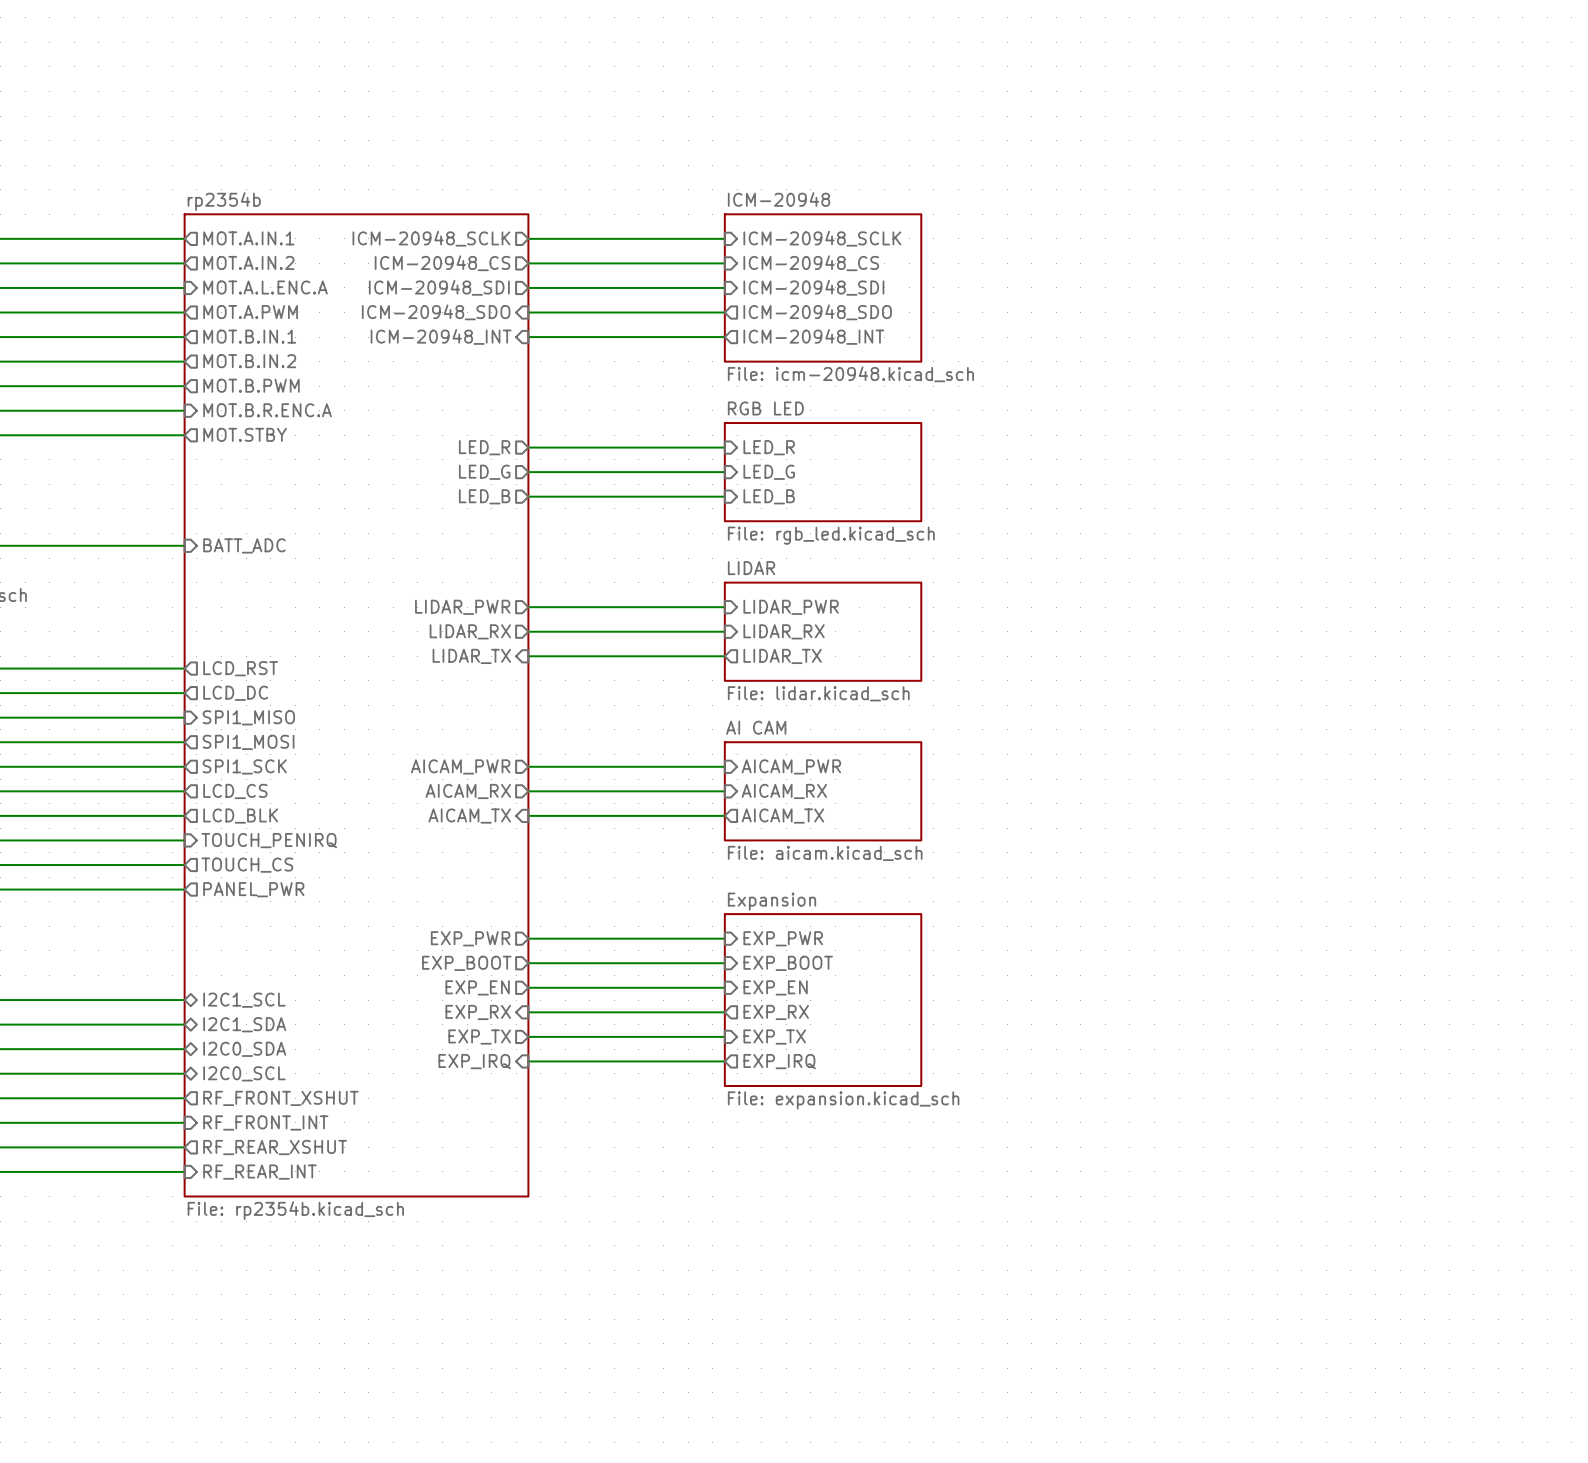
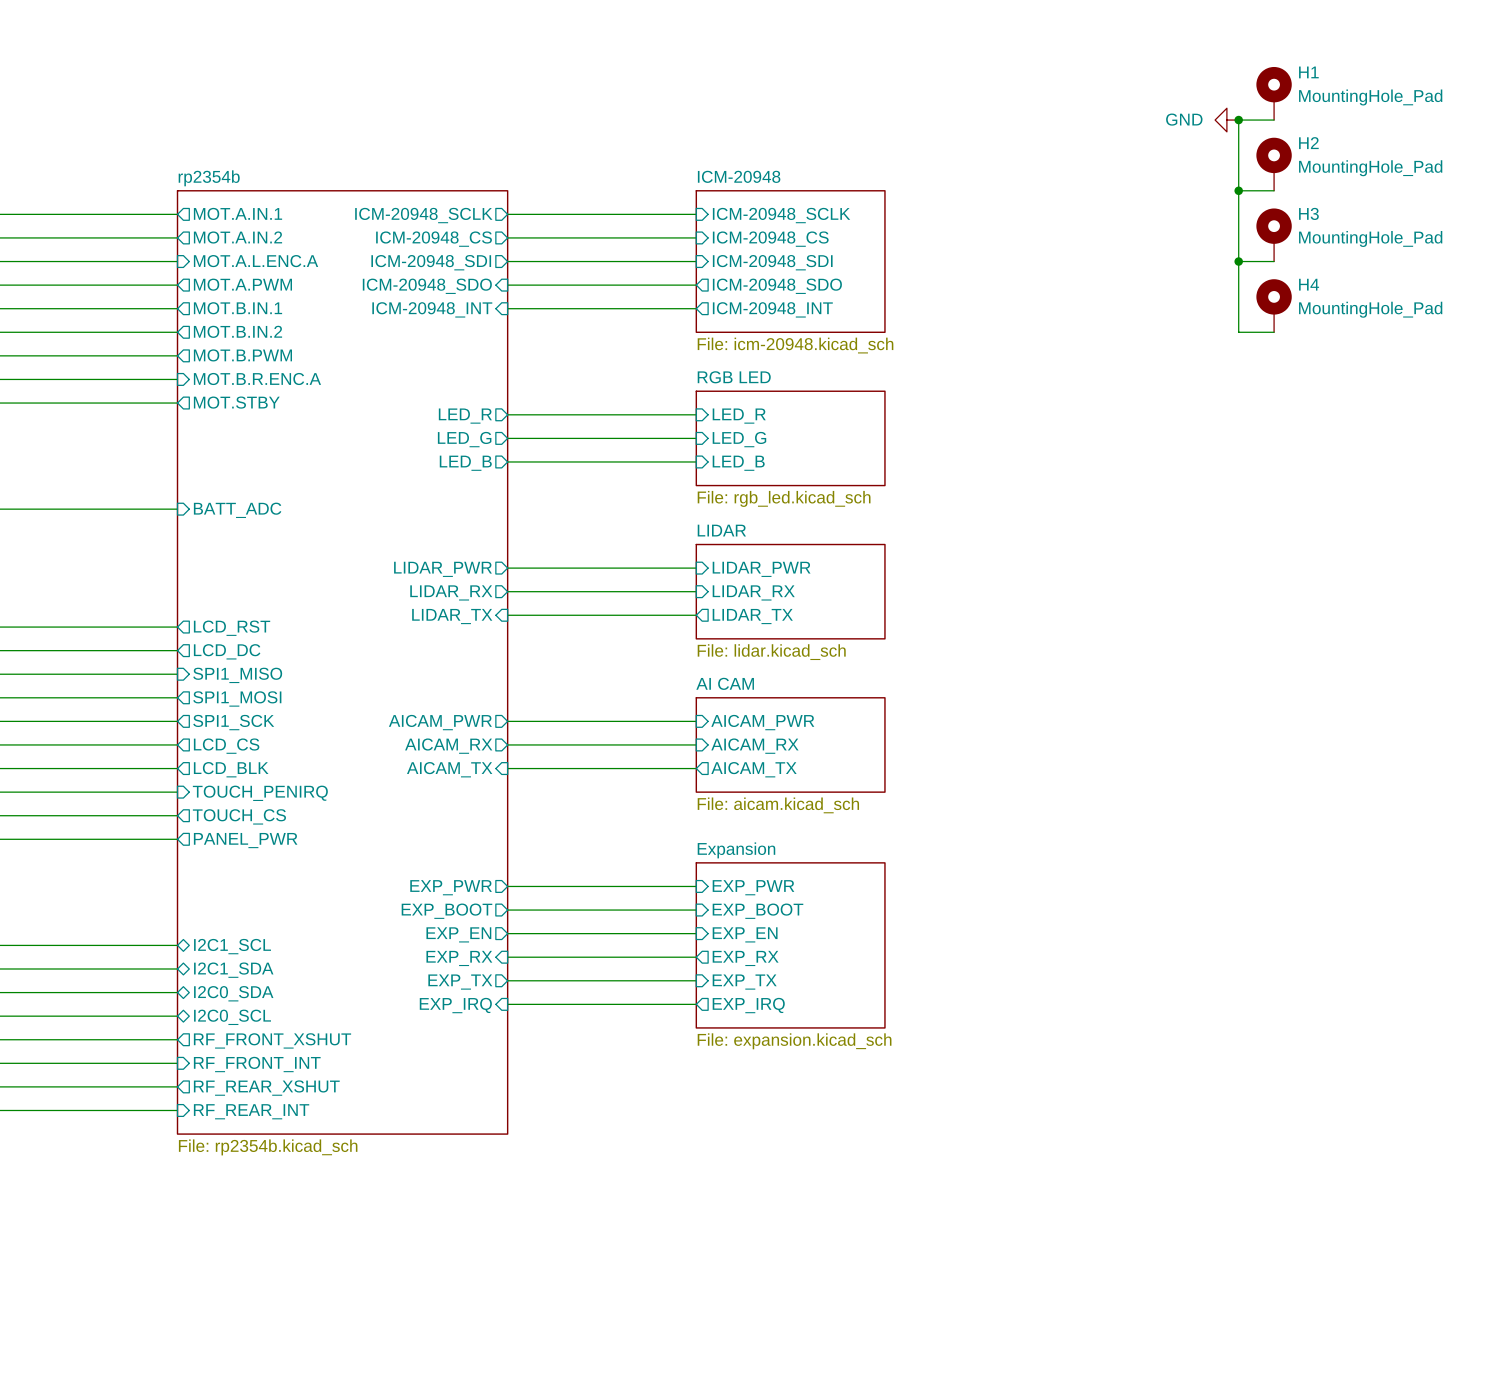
H1: none -> MountingHole_Pad (1274, 93)
power symbol: none -> GND (1226, 120)
junction: none -> (1238, 120)
wire: none -> (1274, 120) (1238, 120) (1238, 332) (1274, 332)
H2: none -> MountingHole_Pad (1274, 164)
wire: none -> (1238, 190) (1274, 190)
junction: none -> (1238, 190)
H3: none -> MountingHole_Pad (1274, 235)
wire: none -> (1238, 261) (1274, 261)
junction: none -> (1238, 261)
H4: none -> MountingHole_Pad (1274, 305)

